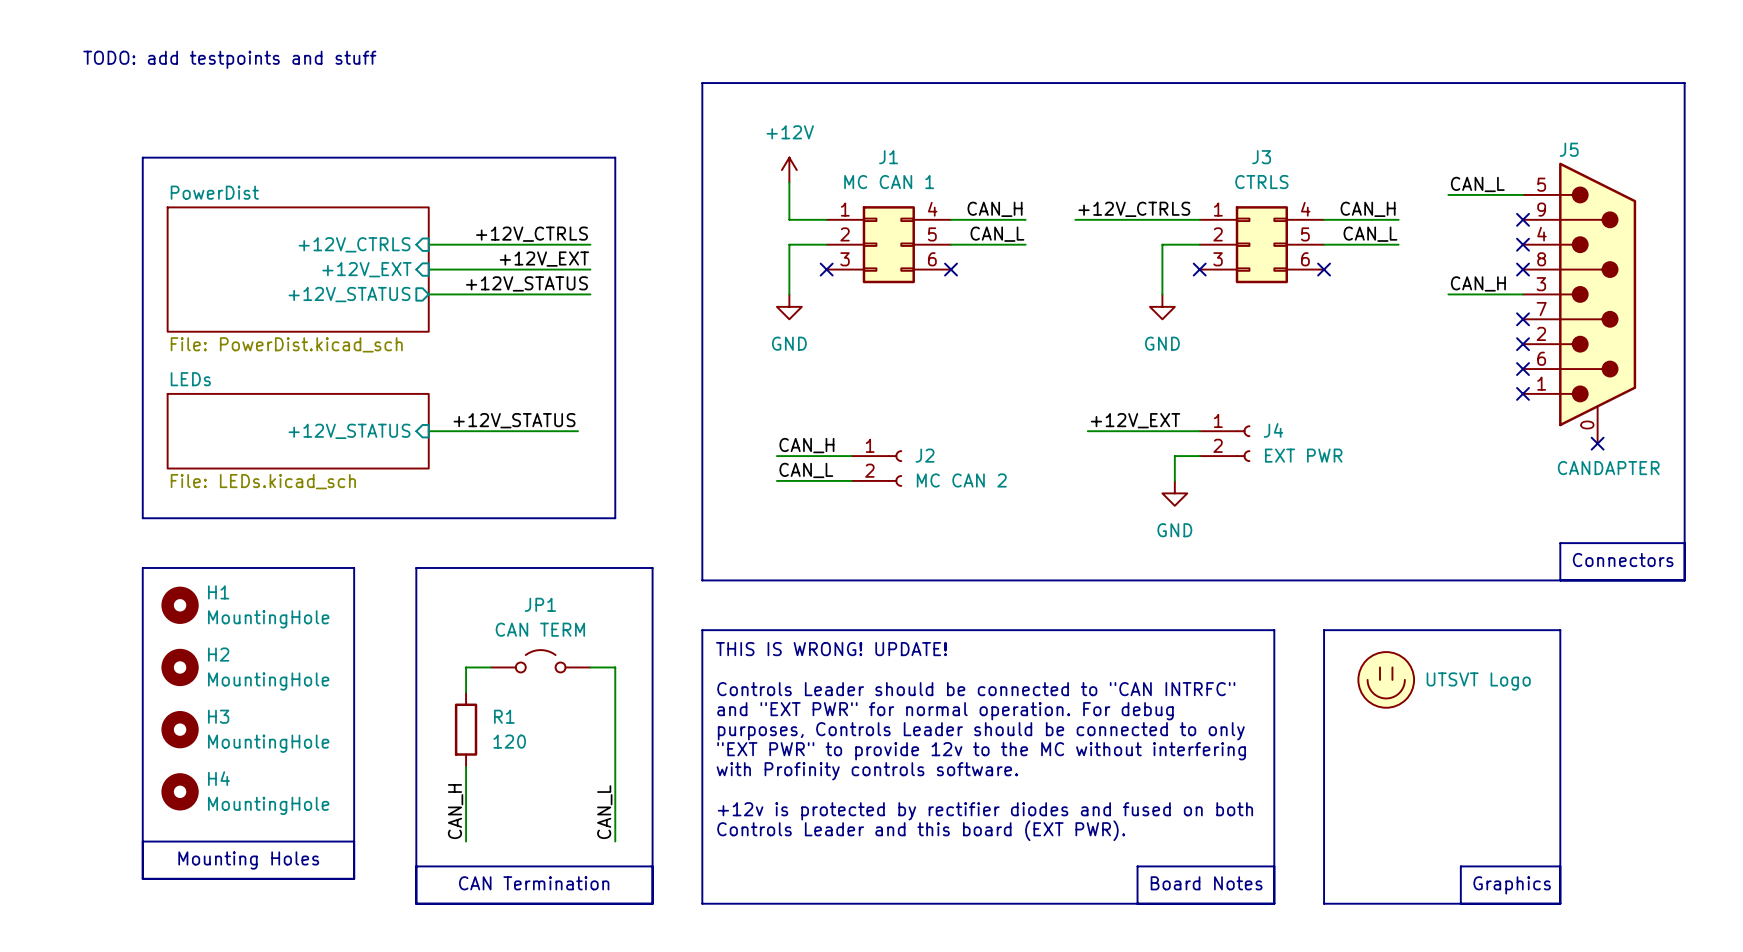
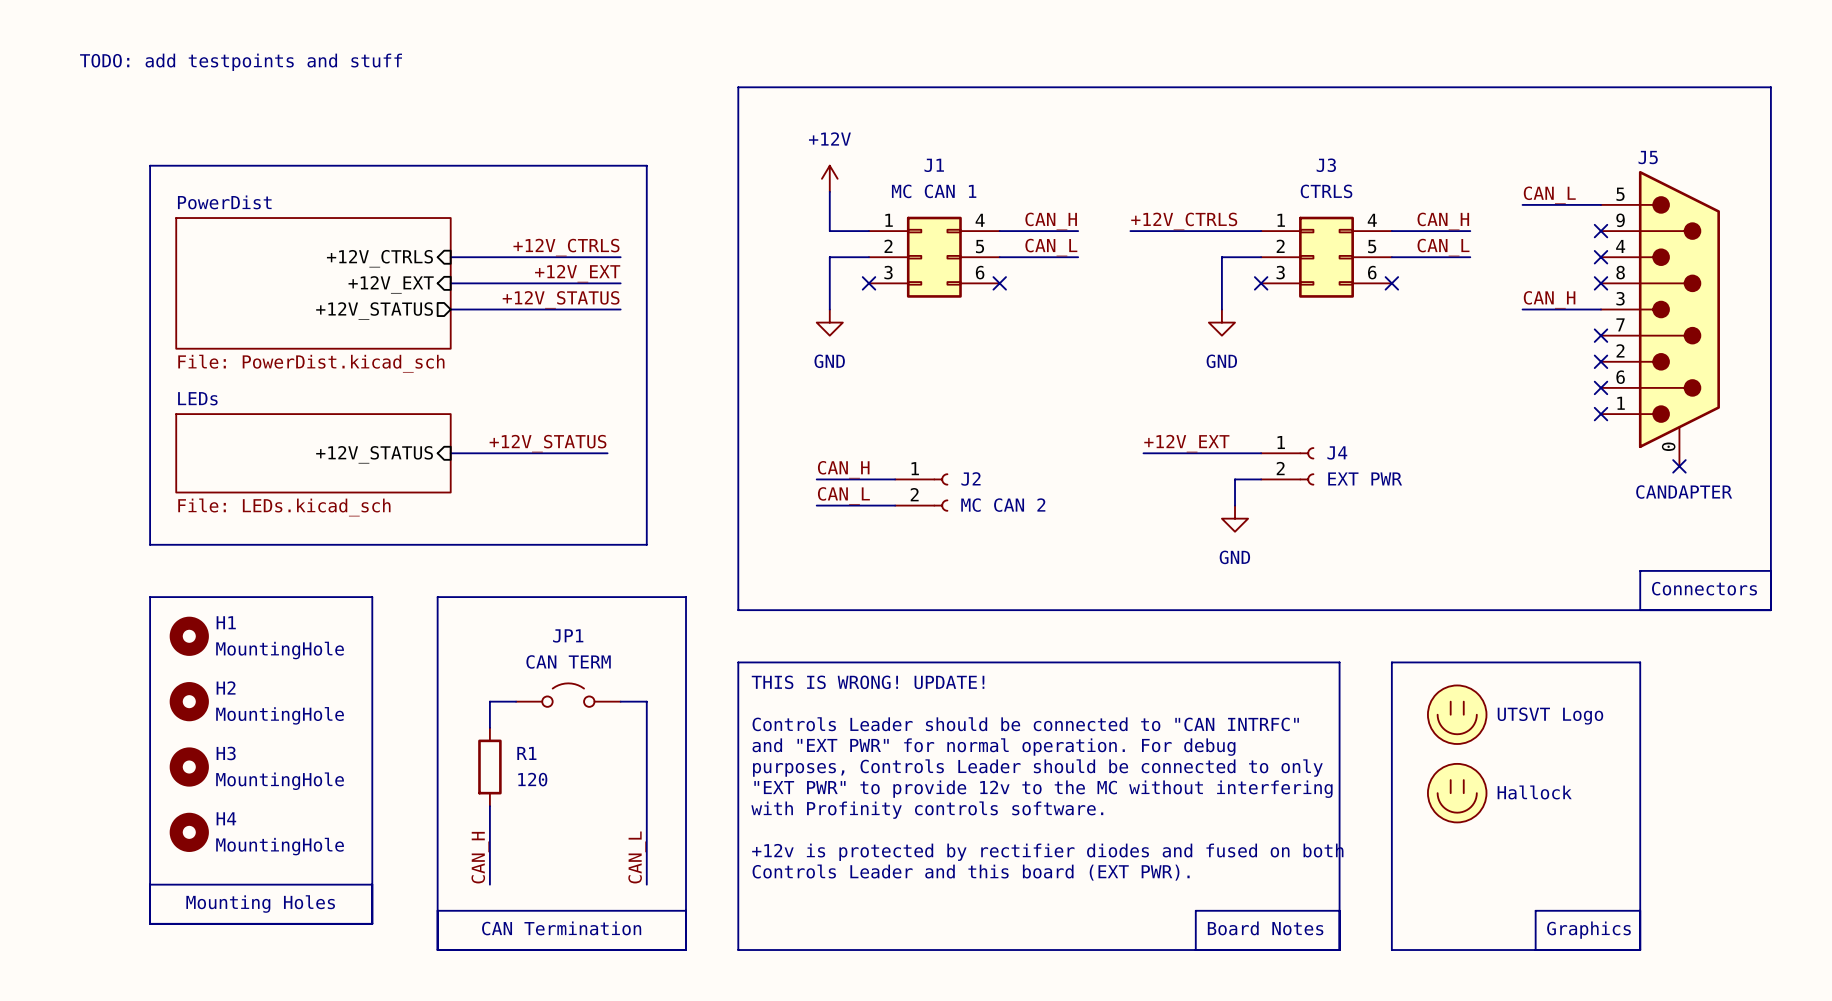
part: none -> Hallock (1457, 793)

